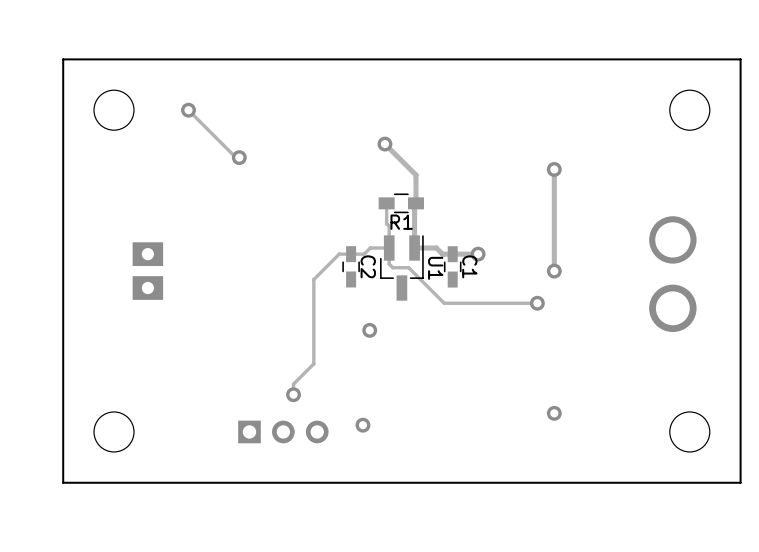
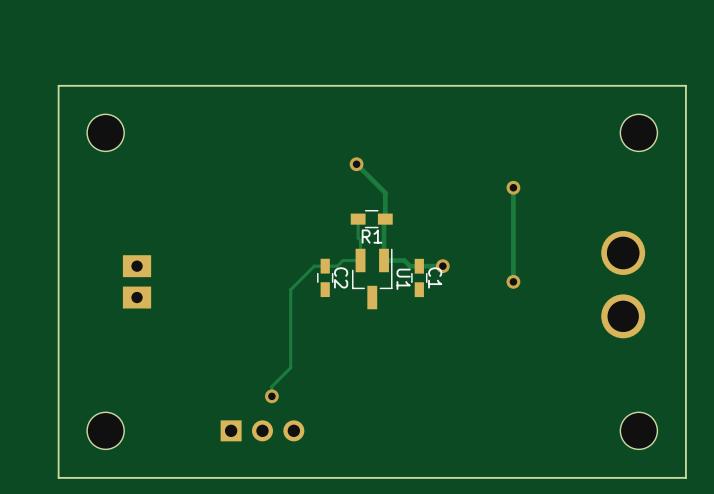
track: (188, 110) (235, 157) (239, 157) -> none
via: (188, 110) -> none
via: (239, 157) -> none
track: (389, 248) (389, 264) (392, 267) (408, 267) (444, 303) (537, 303) -> none
via: (537, 303) -> none
via: (369, 330) -> none
via: (554, 413) -> none
via: (362, 425) -> none

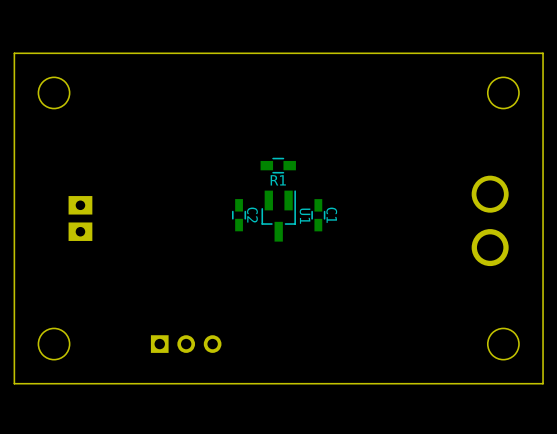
track: (356, 164) (385, 192) (384, 260) (404, 260) (409, 266) (442, 266) -> none
via: (356, 164) -> none
track: (513, 187) (513, 281) -> none
via: (513, 187) -> none
track: (358, 219) (360, 260) (343, 260) (337, 266) (314, 266) (290, 289) (290, 367) (271, 386) (271, 396) -> none
via: (442, 266) -> none
via: (513, 281) -> none
via: (271, 396) -> none

